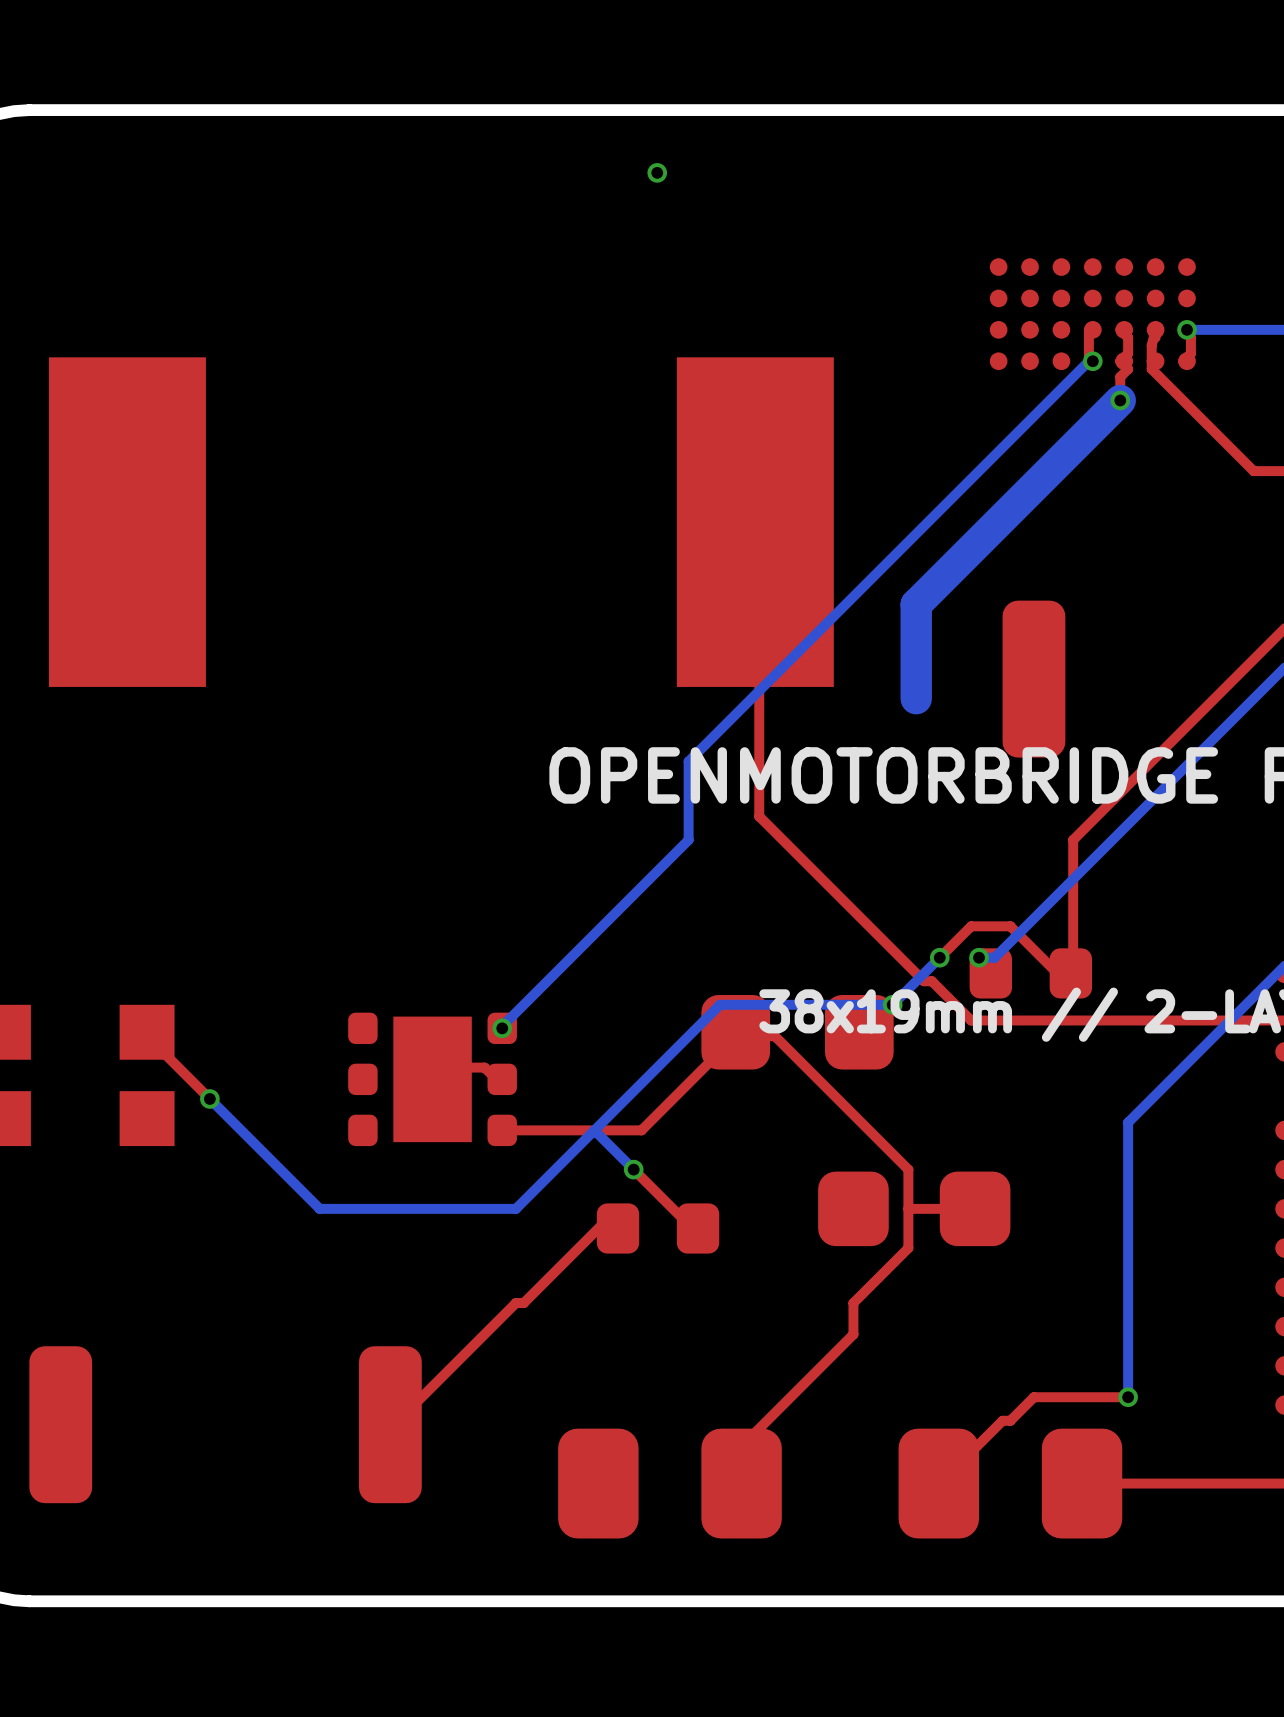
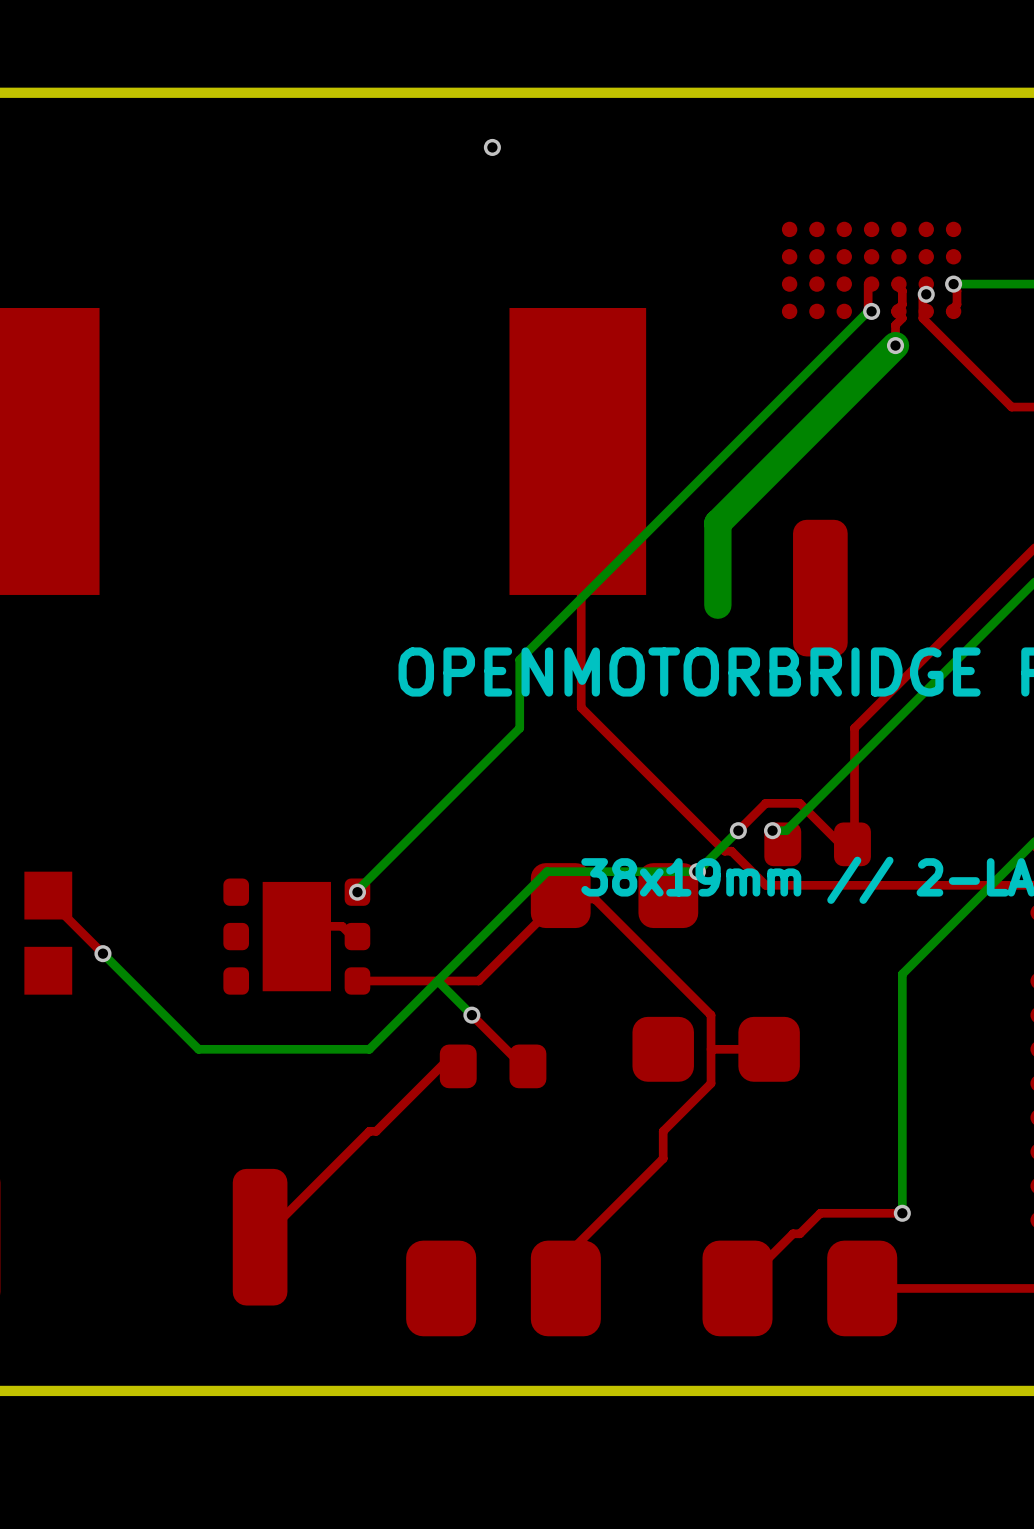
via: none -> (926, 294)

